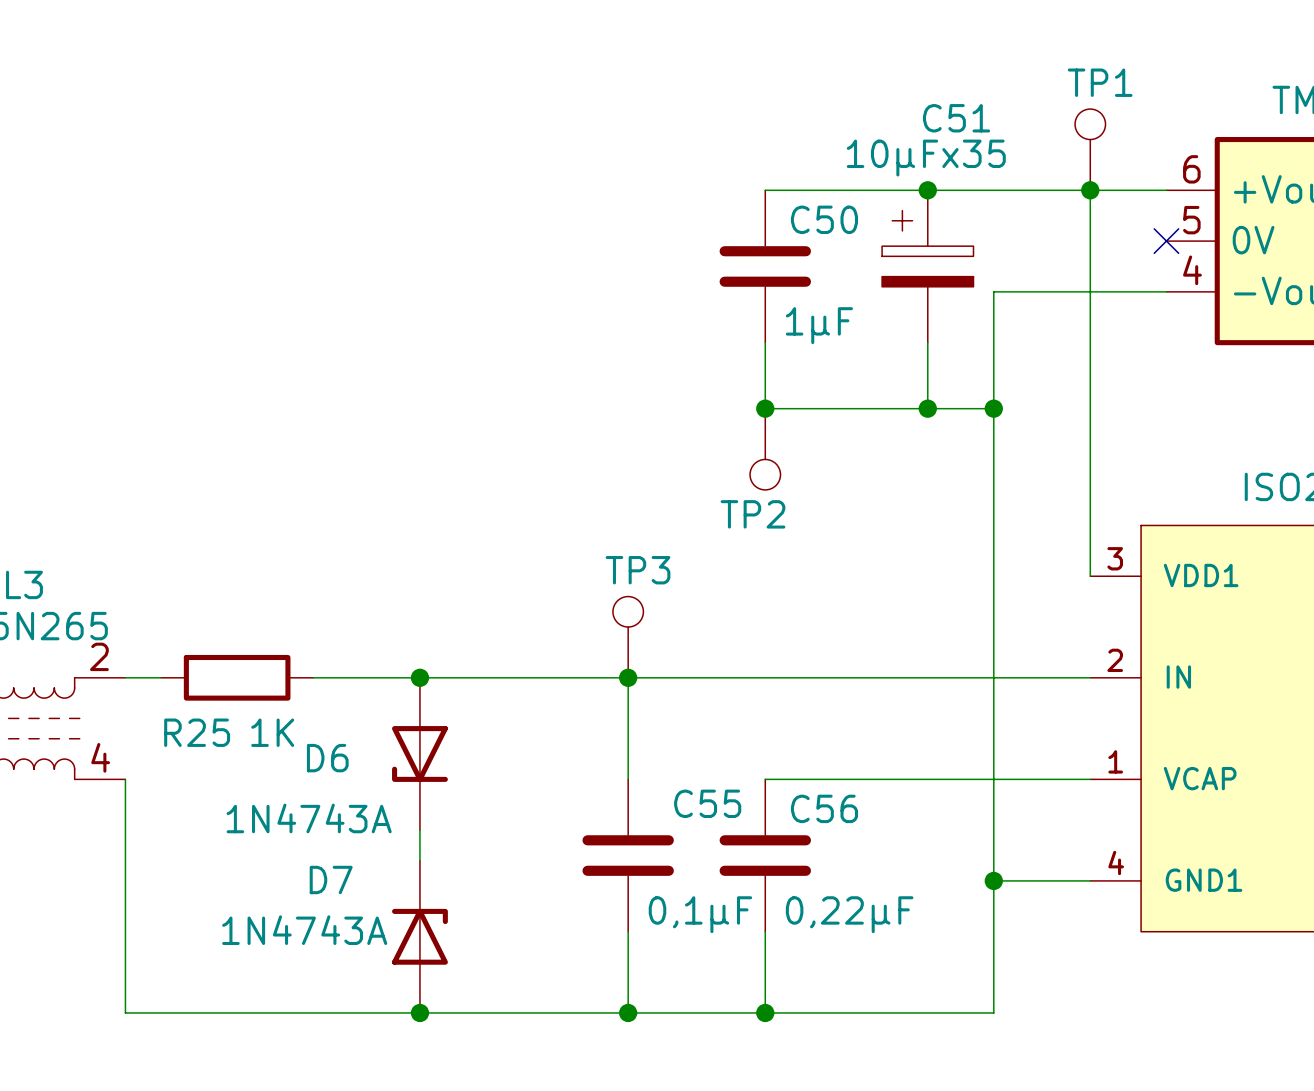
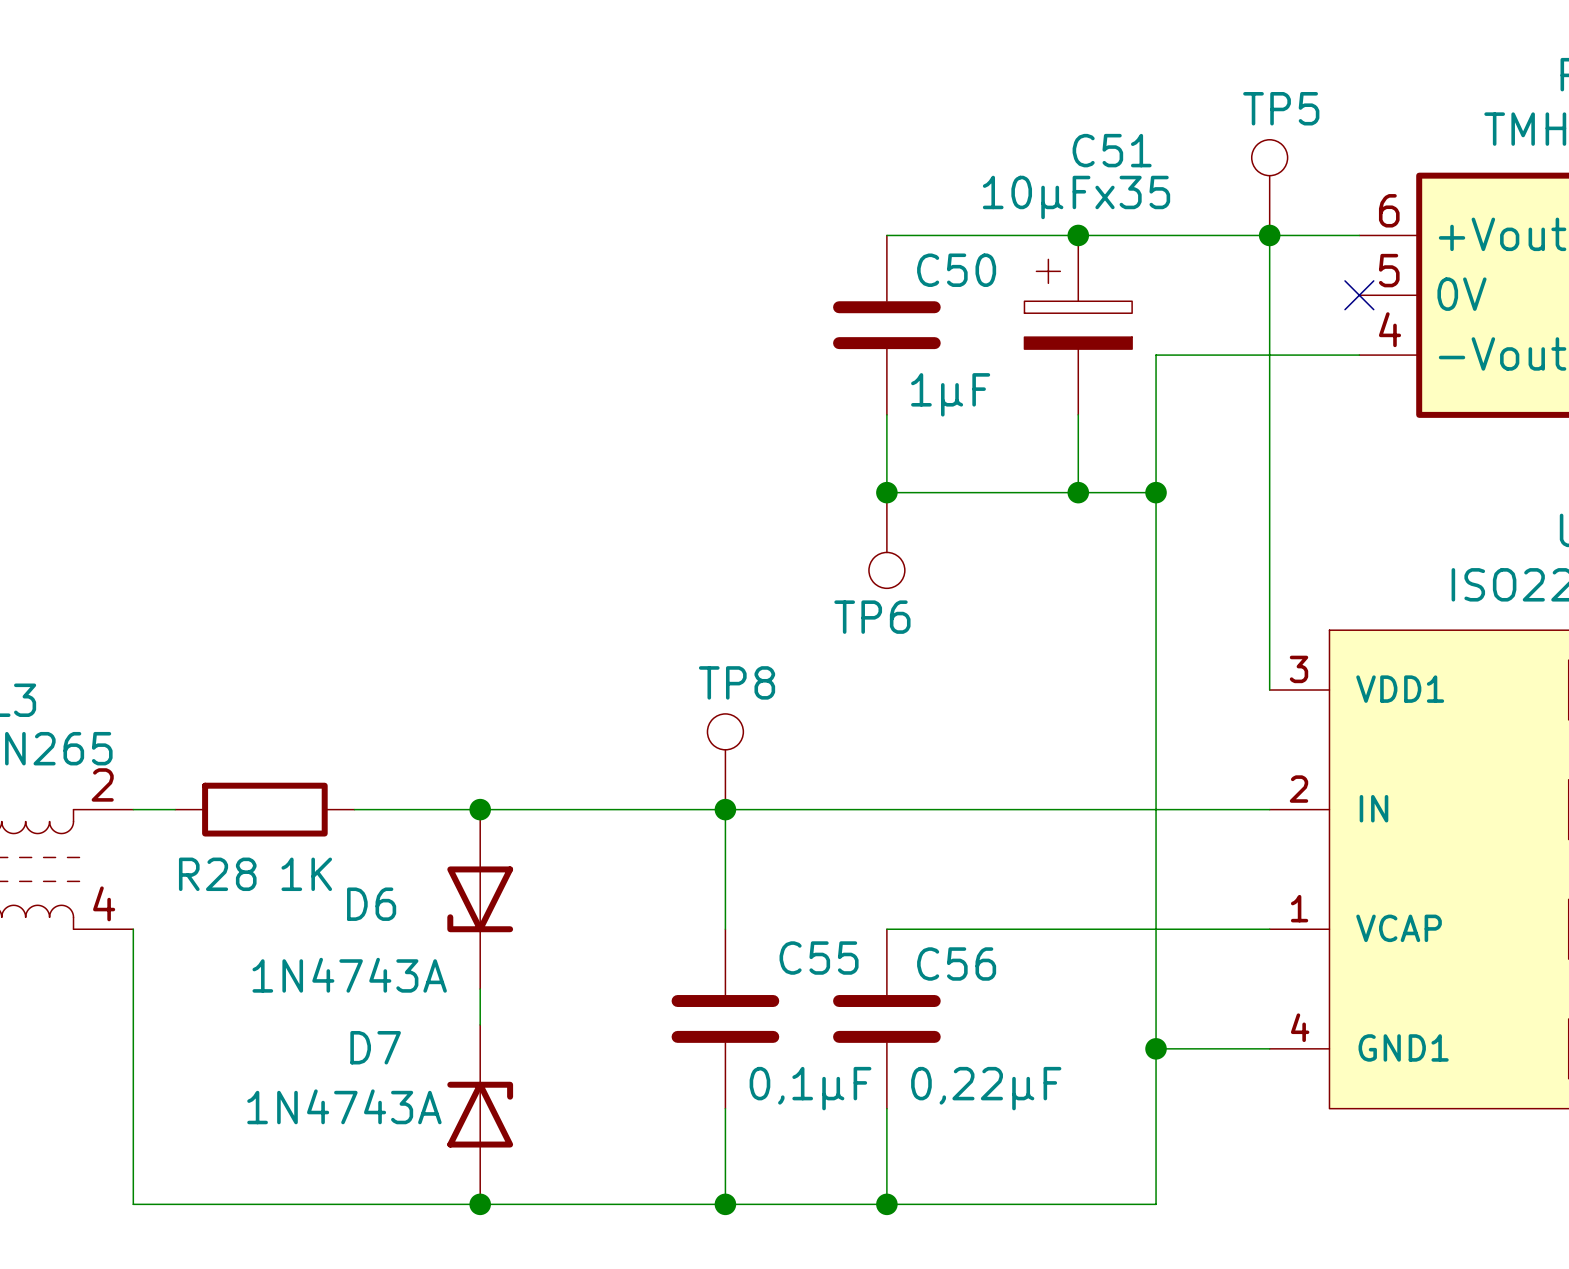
TP1 name: TP1 (1100, 82) -> TP5 (1281, 108)
TP2 name: TP2 (753, 514) -> TP6 (872, 617)
TP3 name: TP3 (638, 570) -> TP8 (737, 682)
R25 name: R25 (197, 732) -> R28 (217, 874)

